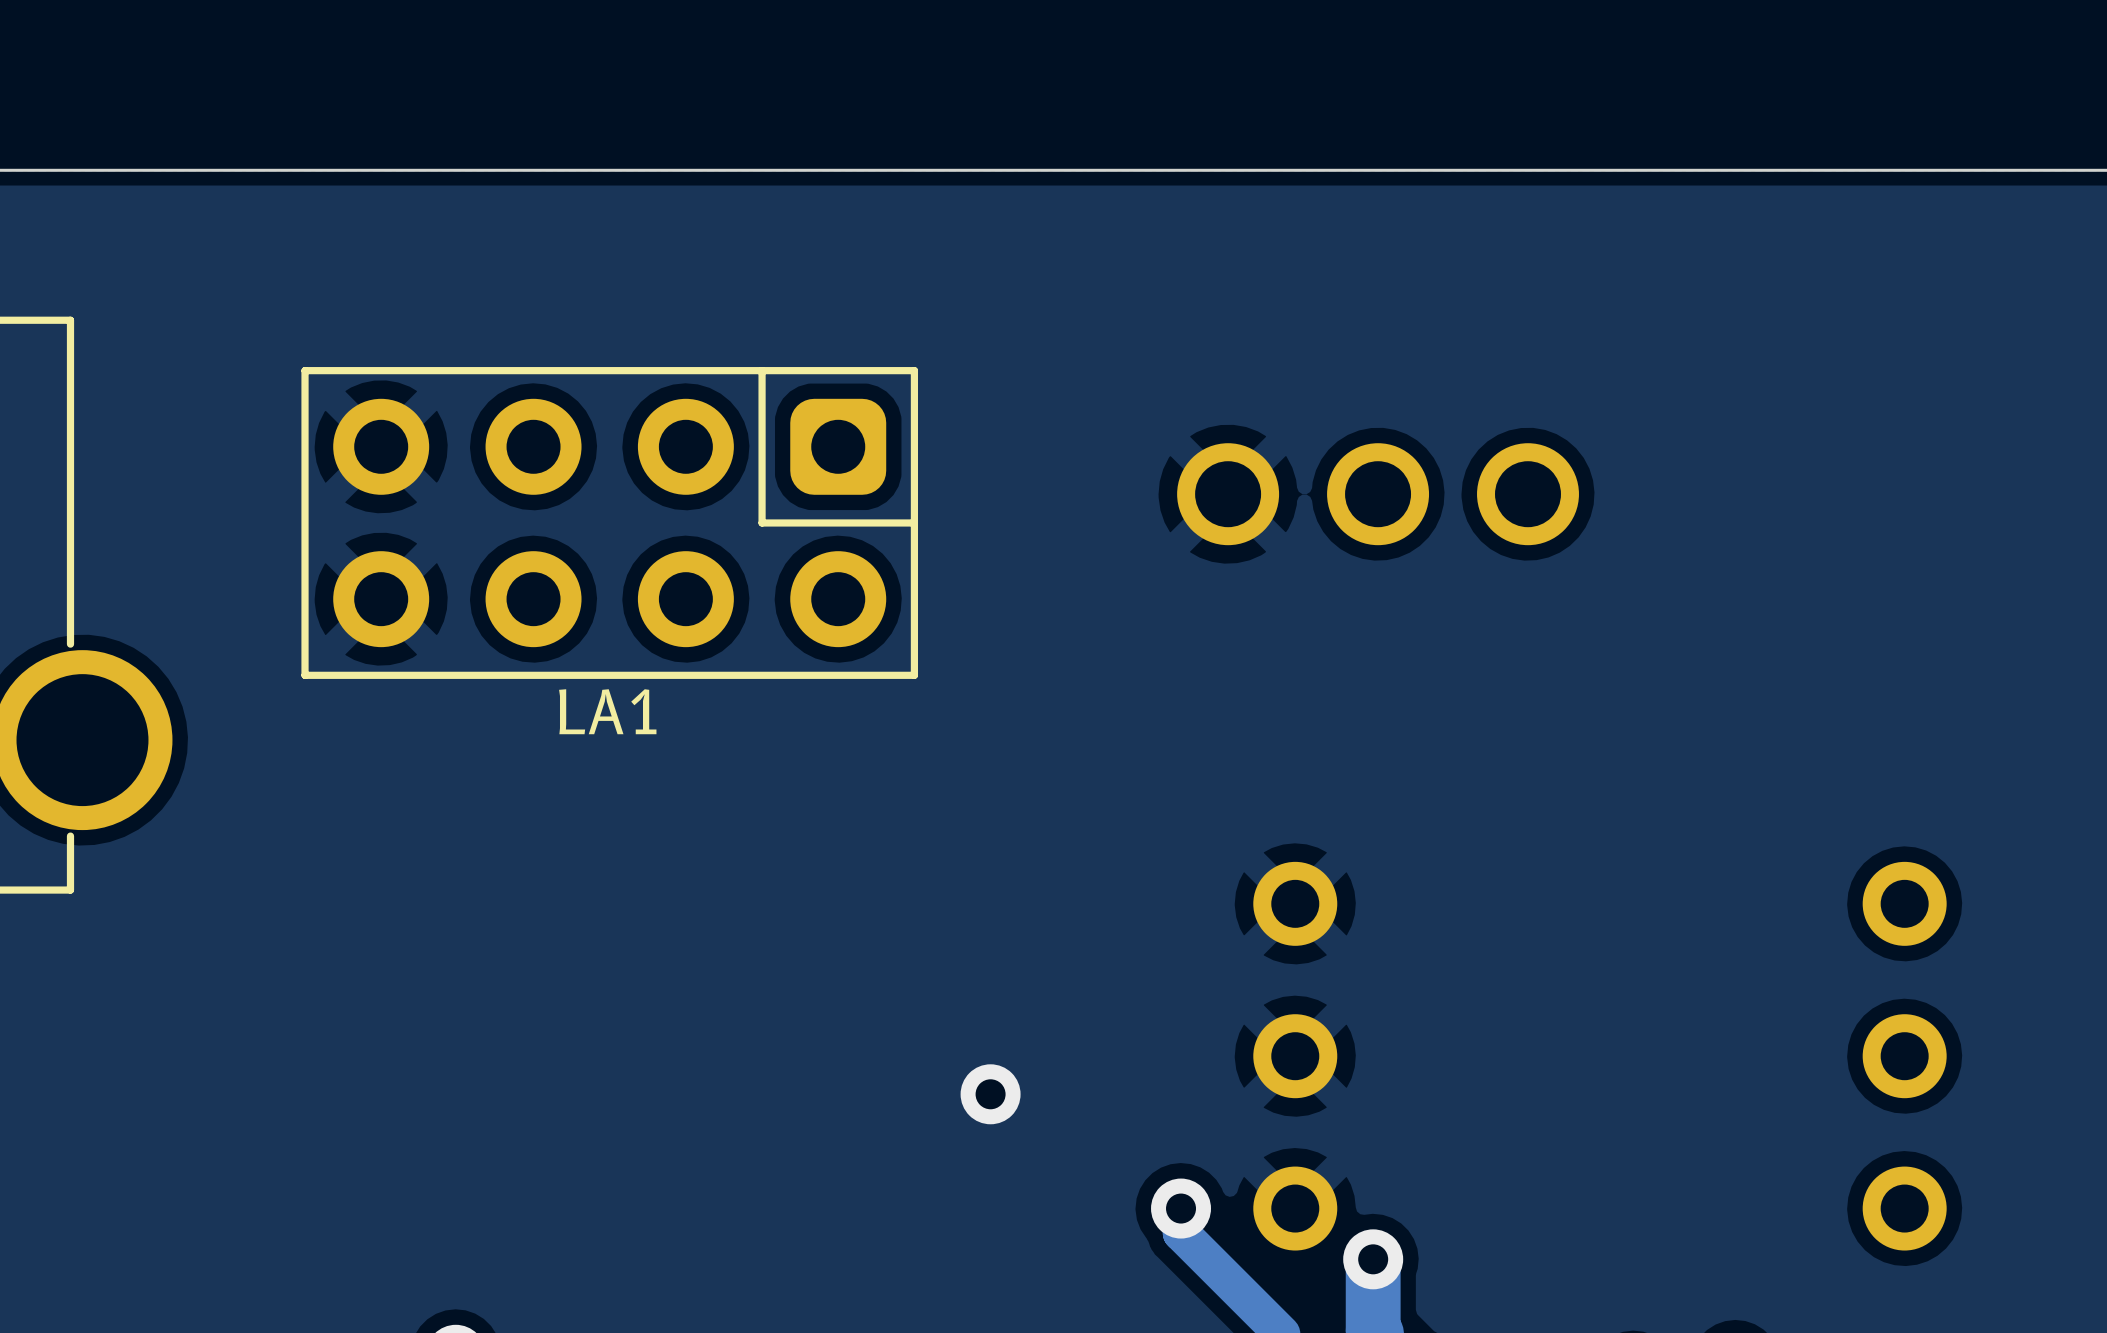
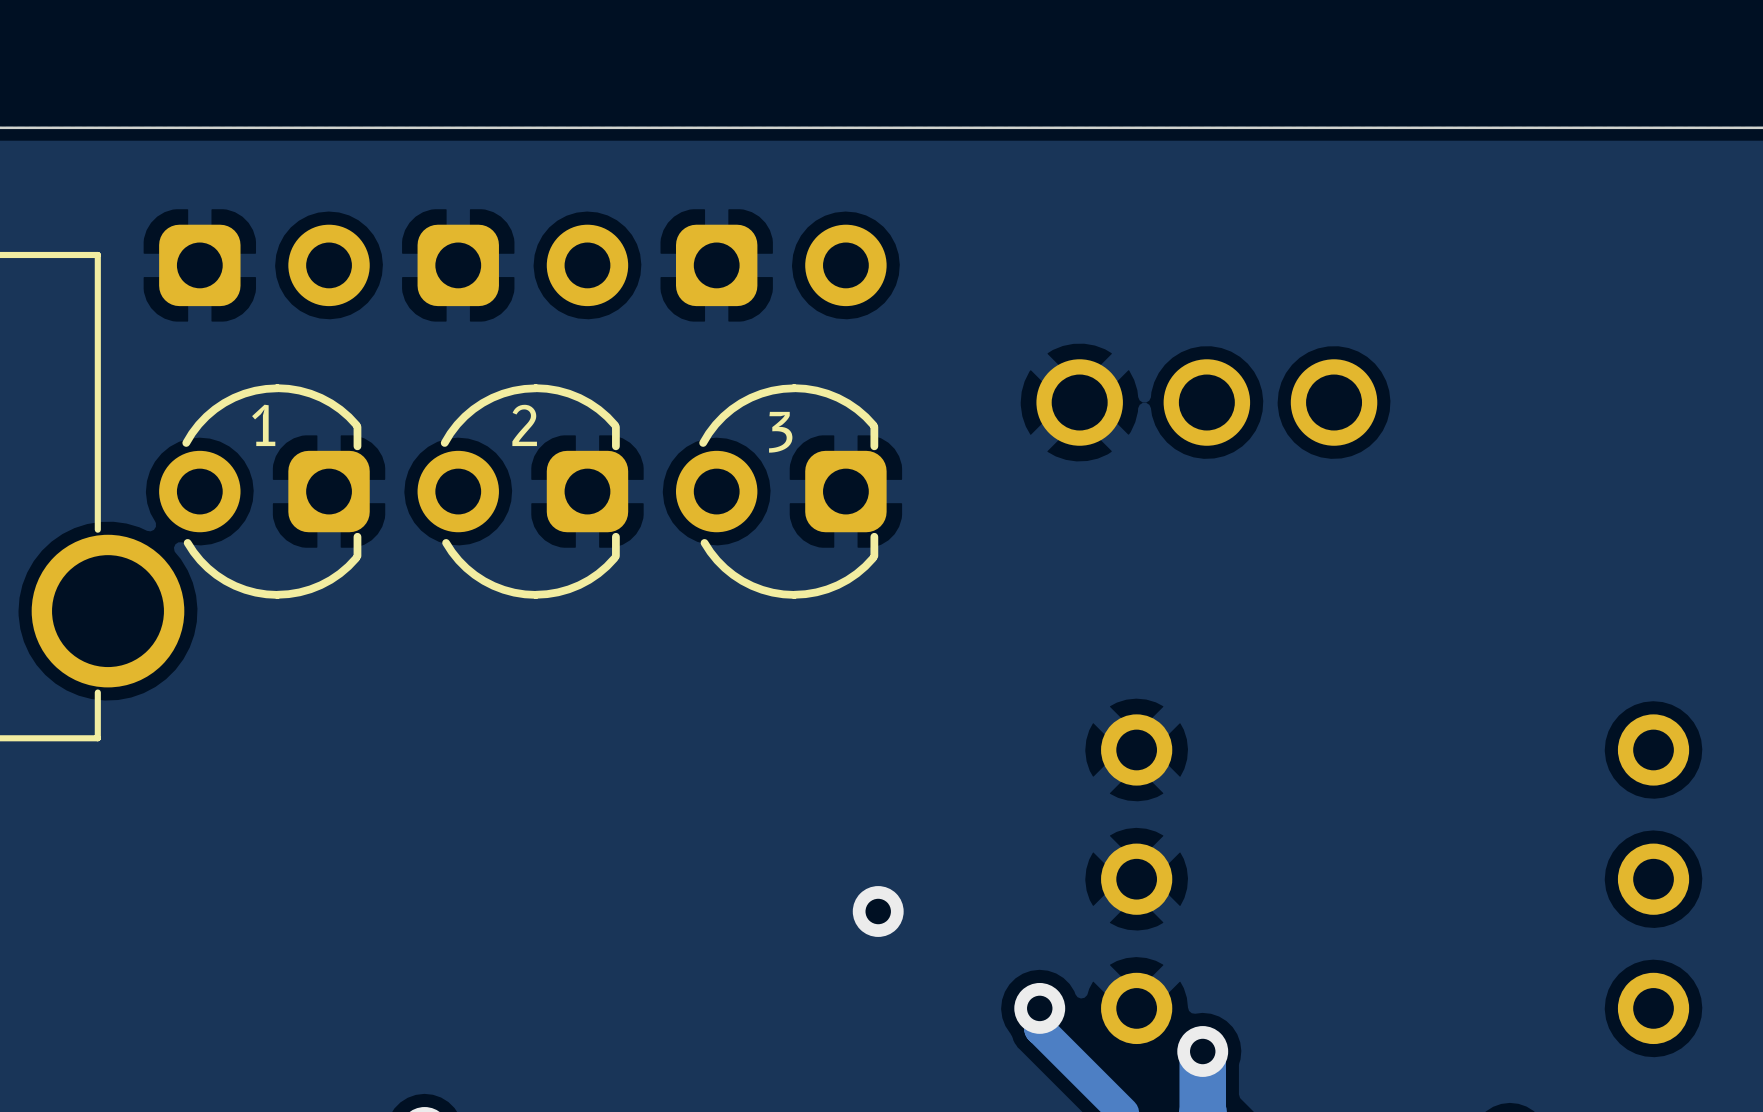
part: none -> (264, 265)
part: none -> (522, 265)
part: none -> (781, 265)
LA1: (609, 522) -> none
part: none -> 1 (264, 491)
part: none -> 2 (522, 491)
part: none -> 3 (781, 491)

